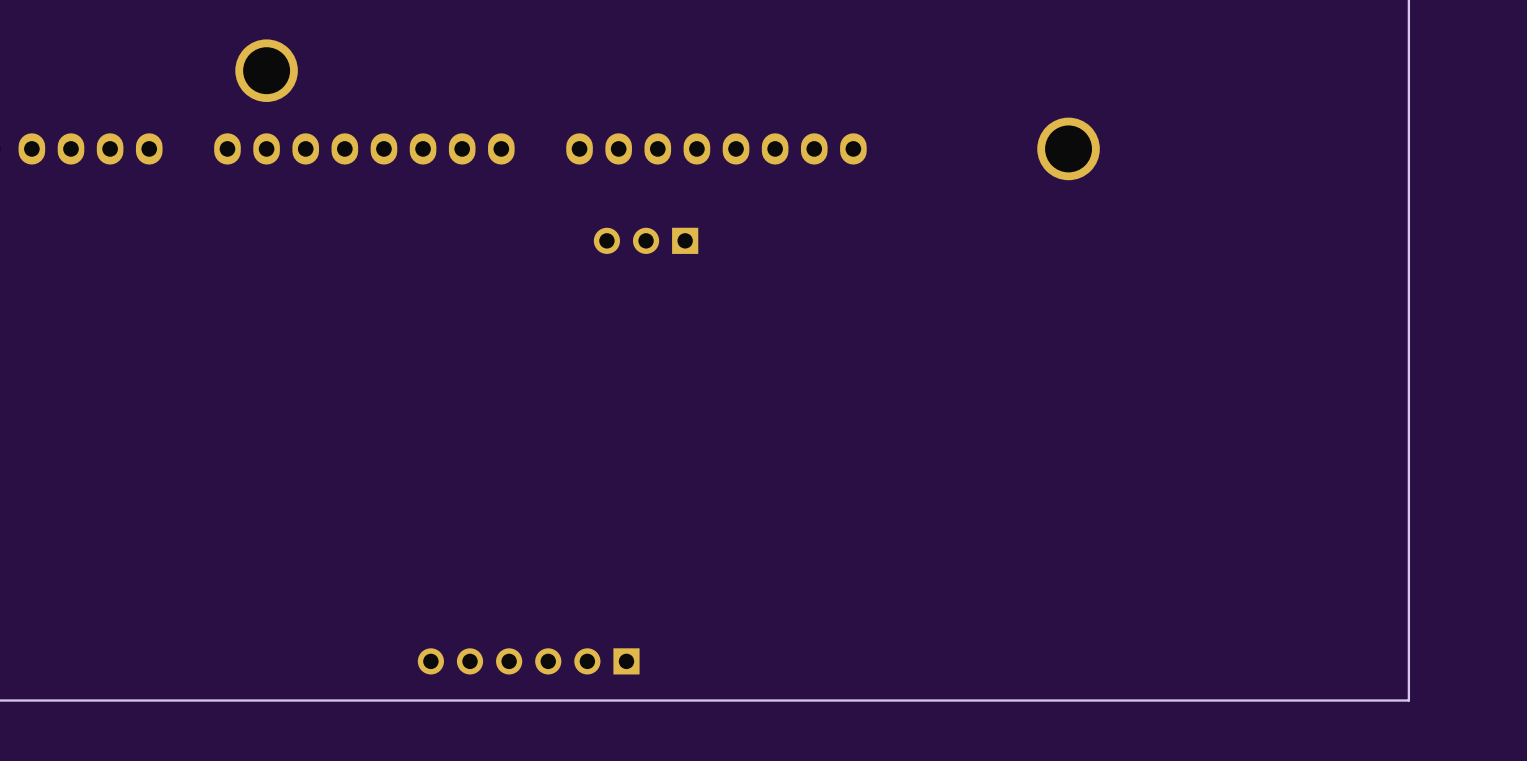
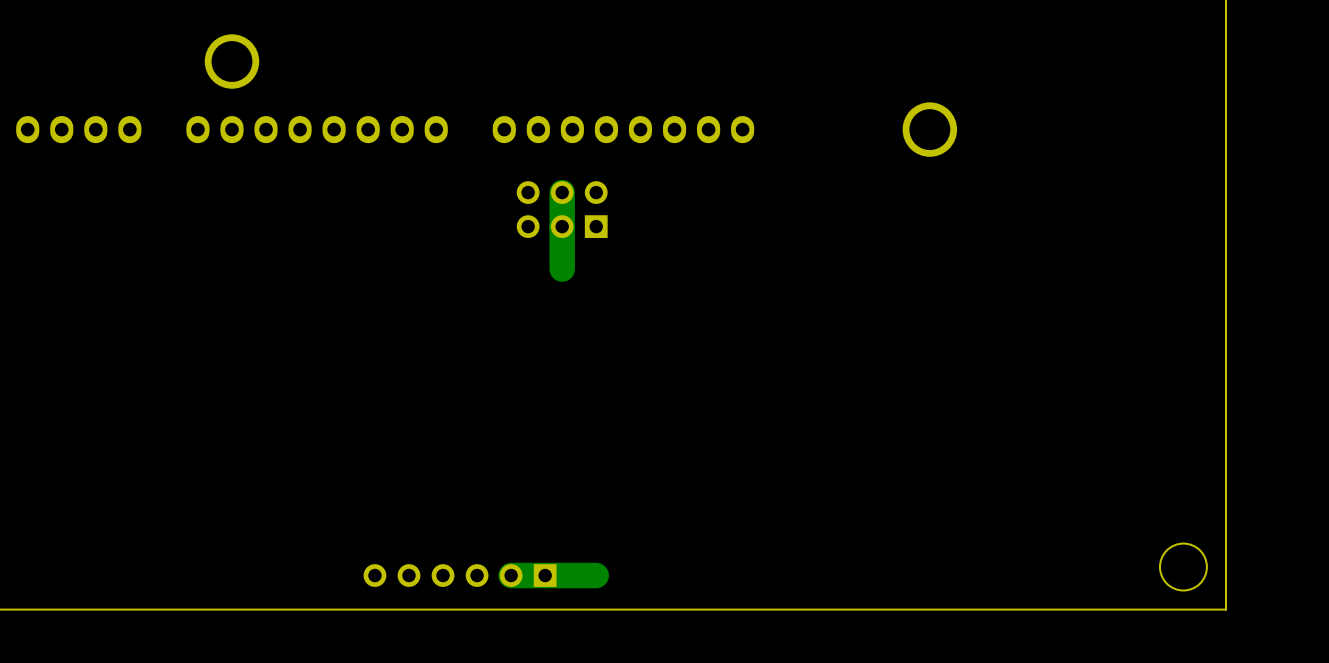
track: none -> (562, 192) (562, 269)
part footprint: [593, 227, 699, 254] -> [516, 181, 608, 239]
round board edge: none -> [1158, 542, 1208, 592]
track: none -> (596, 575) (511, 575)

